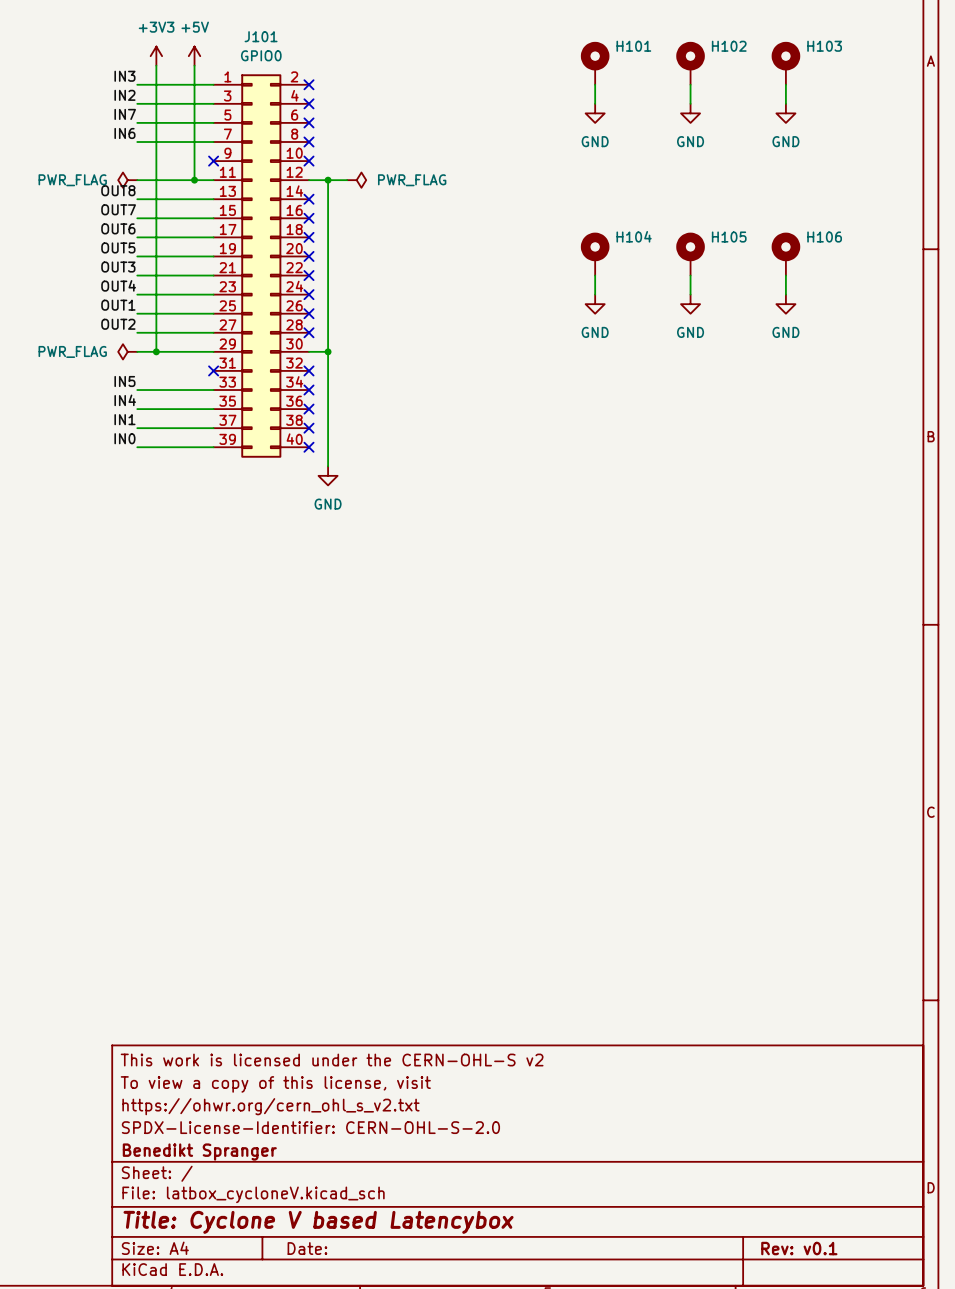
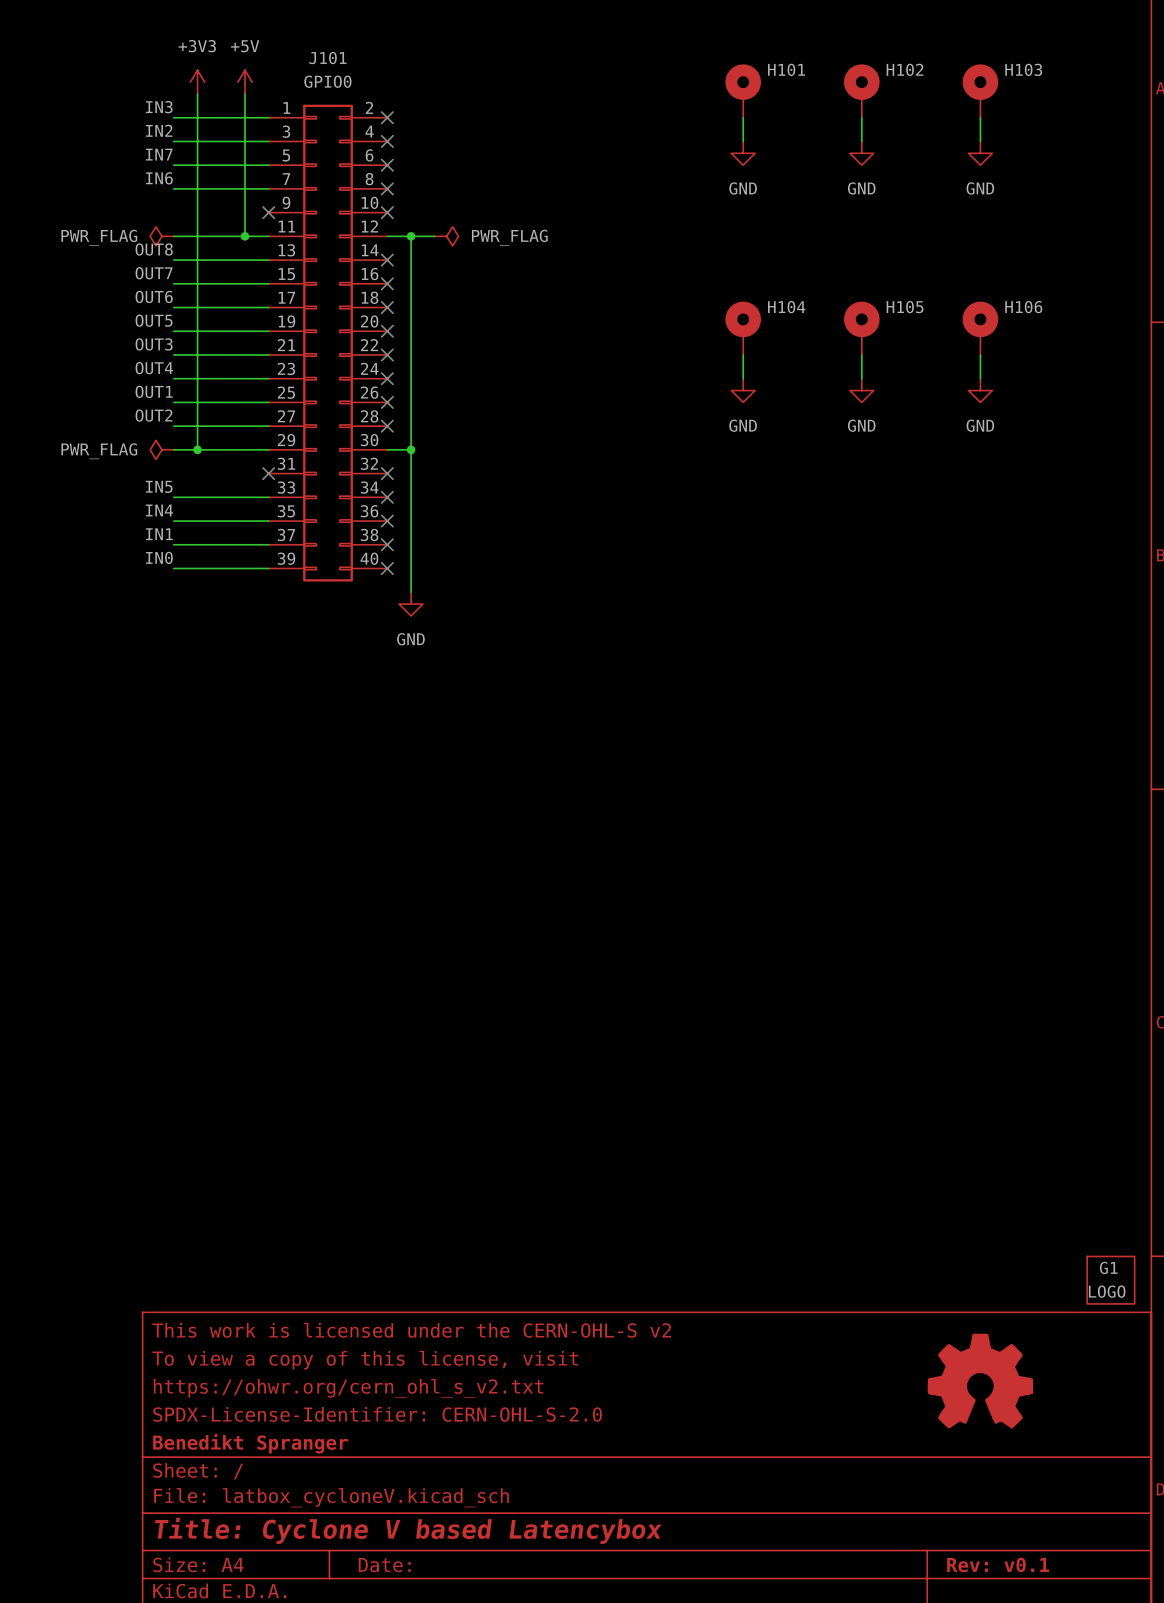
G1: none -> LOGO (1110, 1280)
power symbol: none -> (980, 1381)

